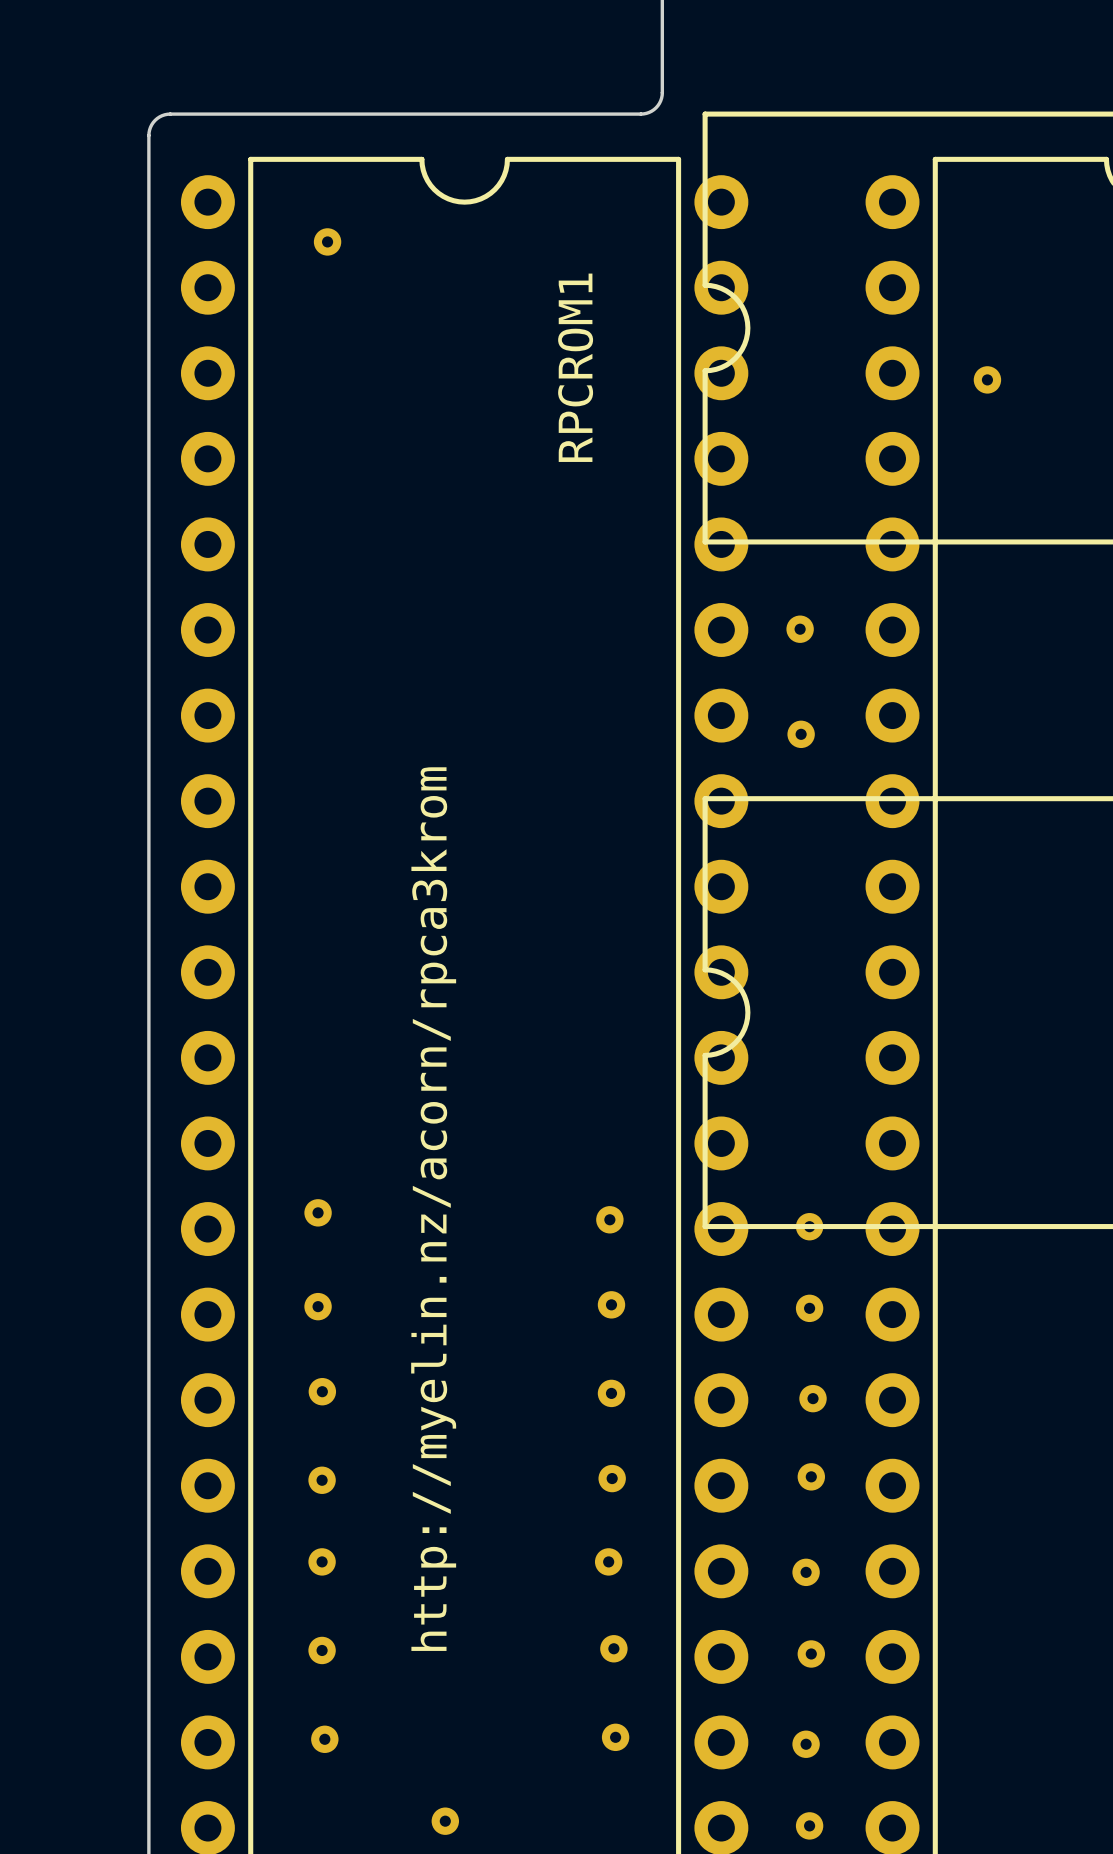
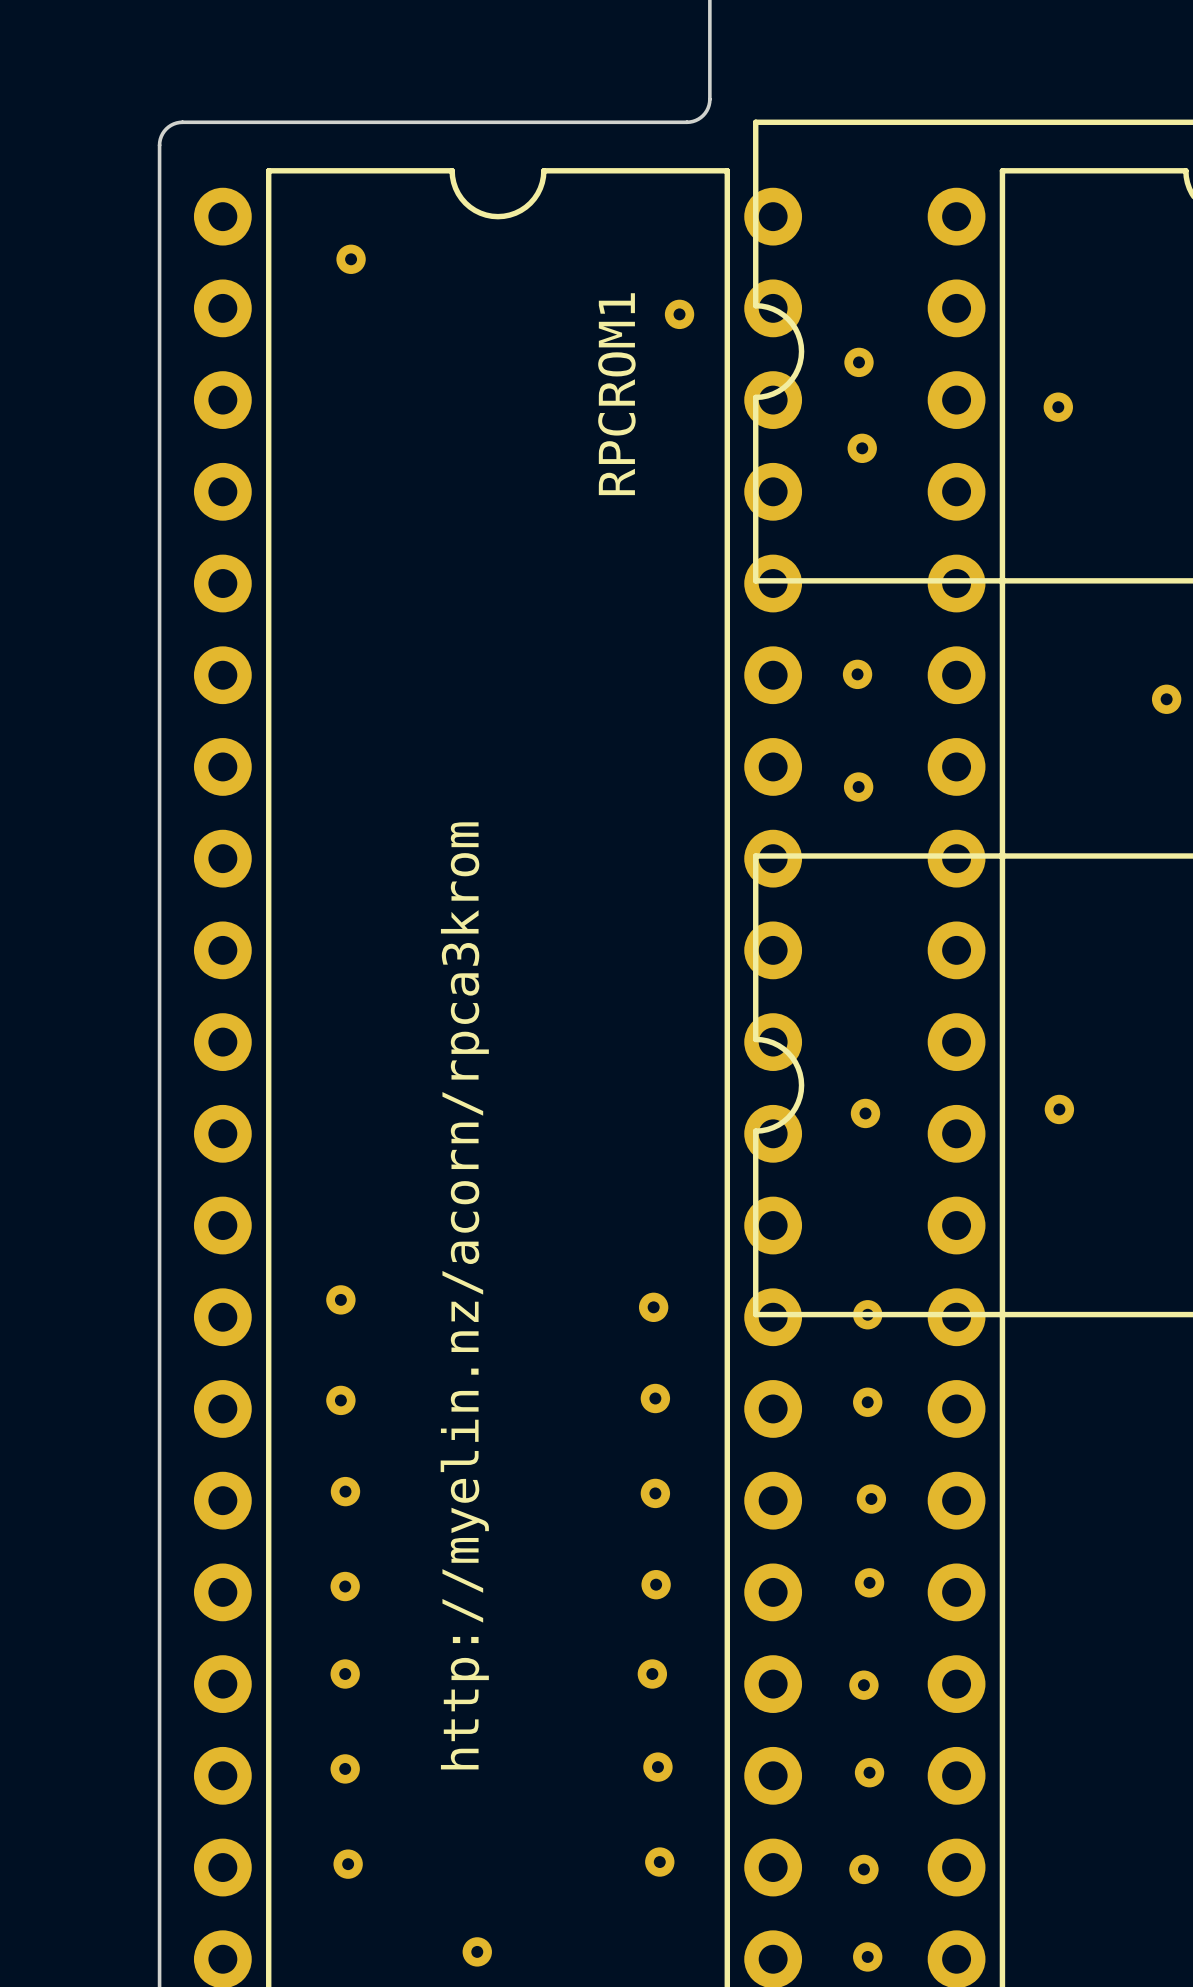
part: none -> (679, 314)
part: none -> (858, 362)
part: none -> (862, 448)
part: none -> (1166, 699)
part: none -> (1059, 1109)
part: none -> (865, 1113)

